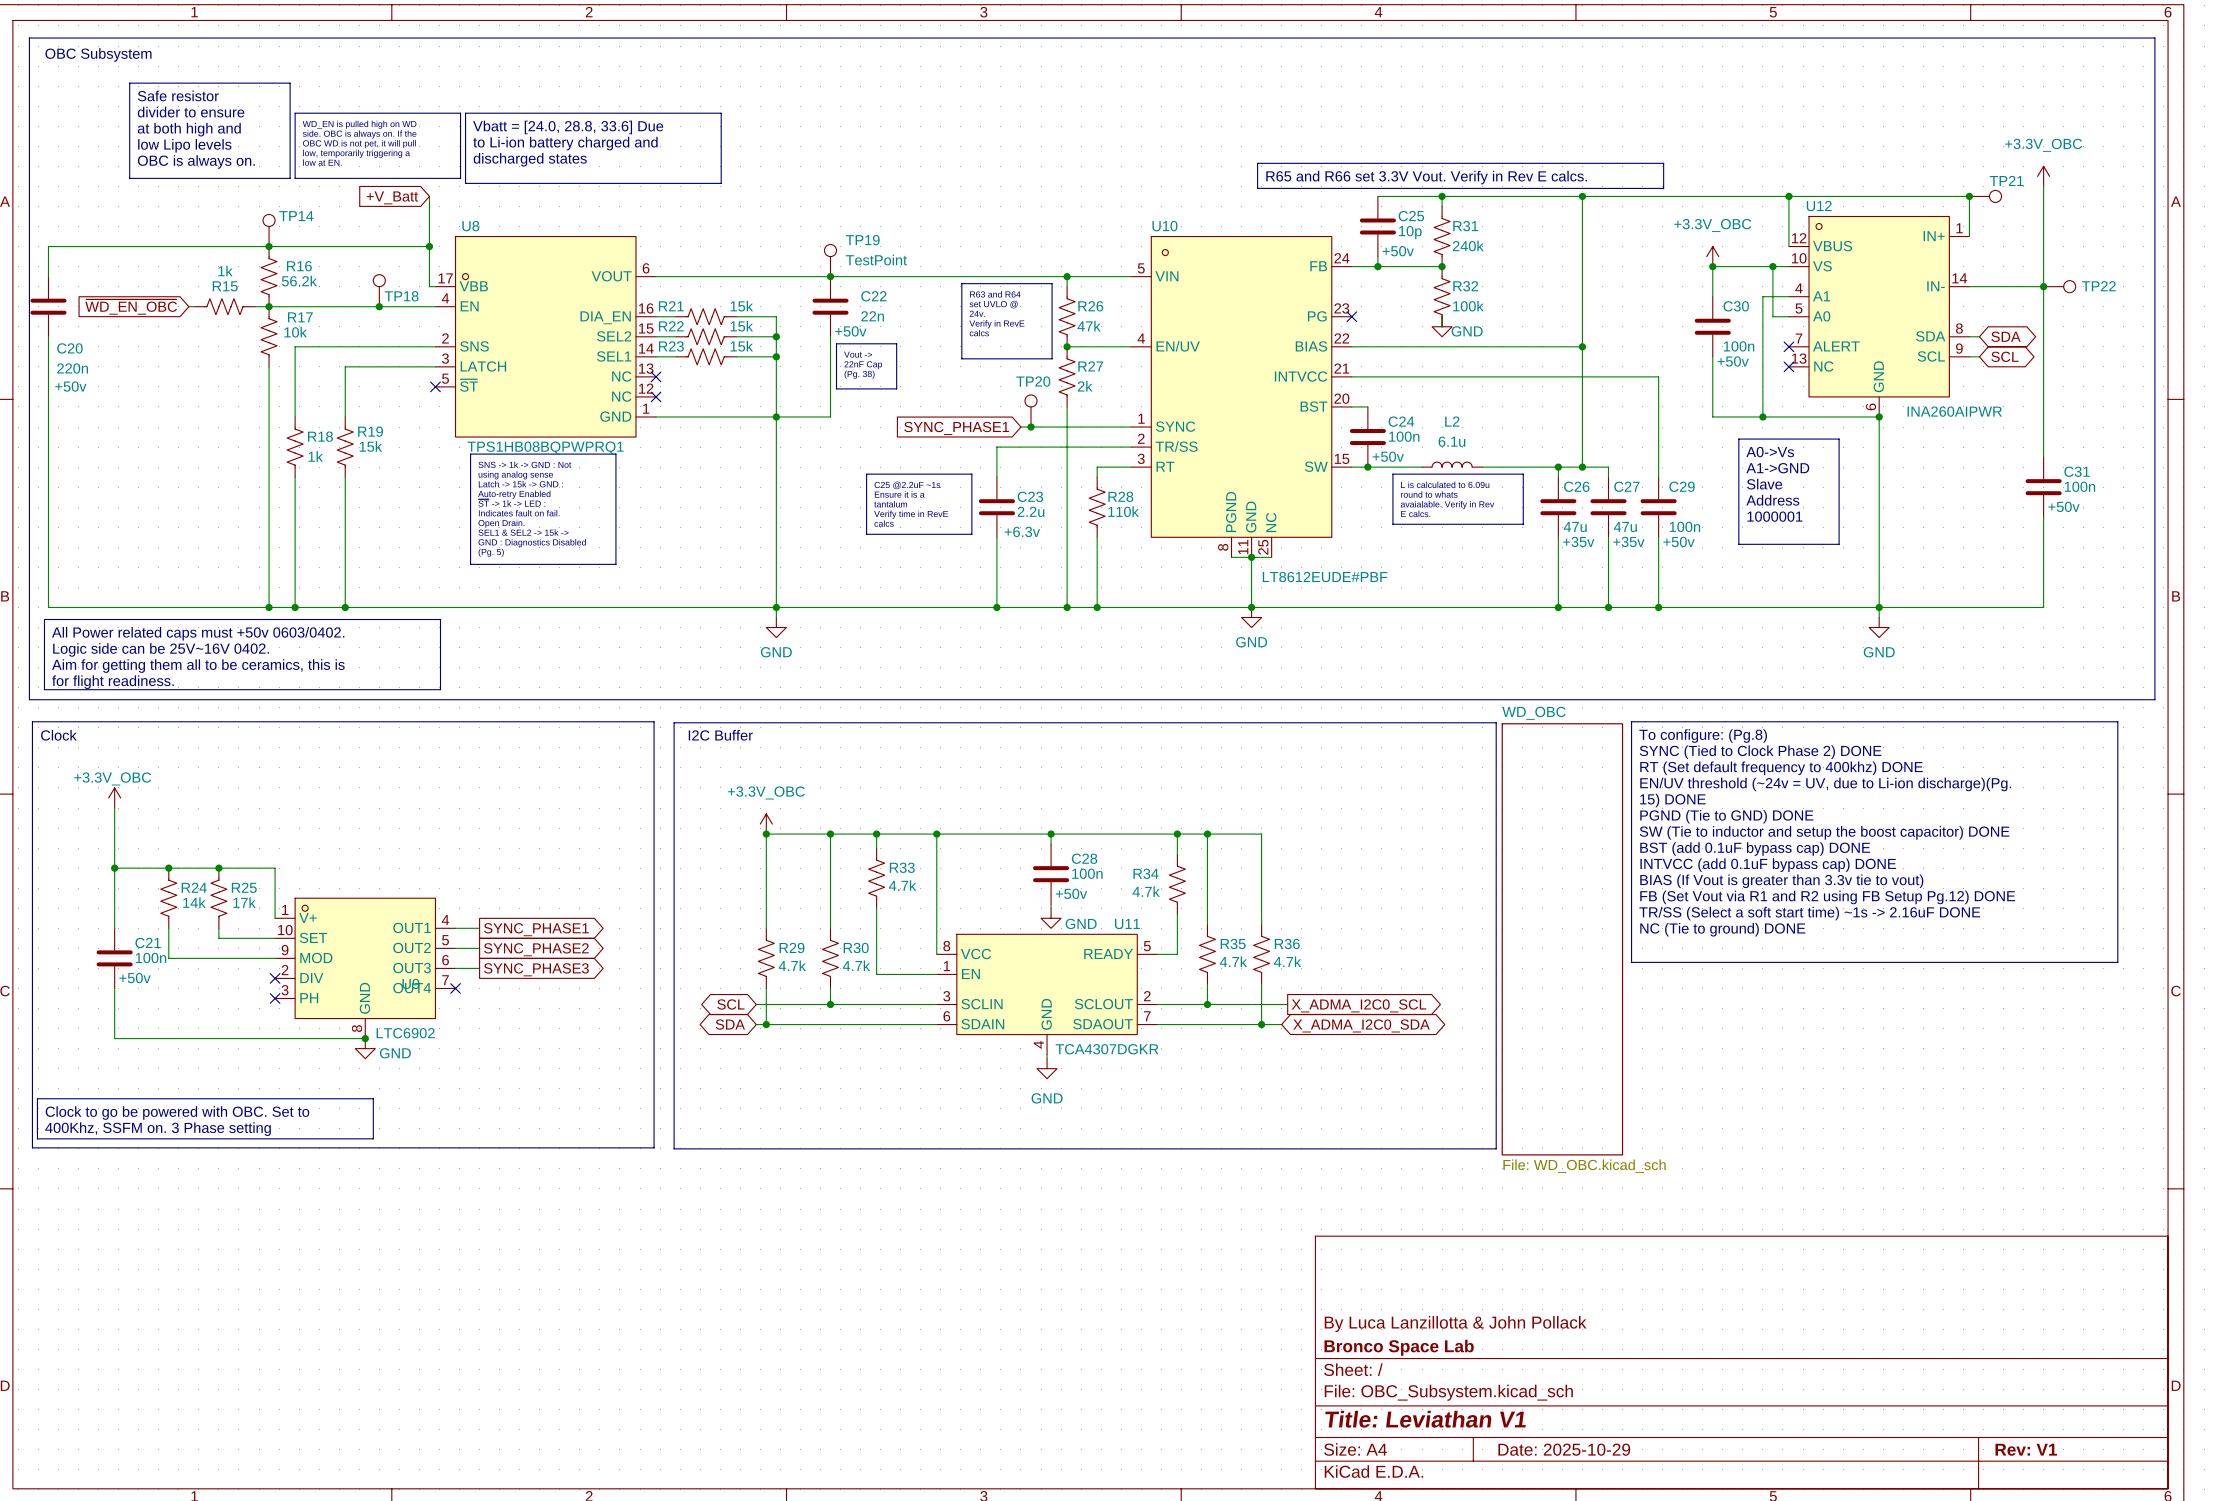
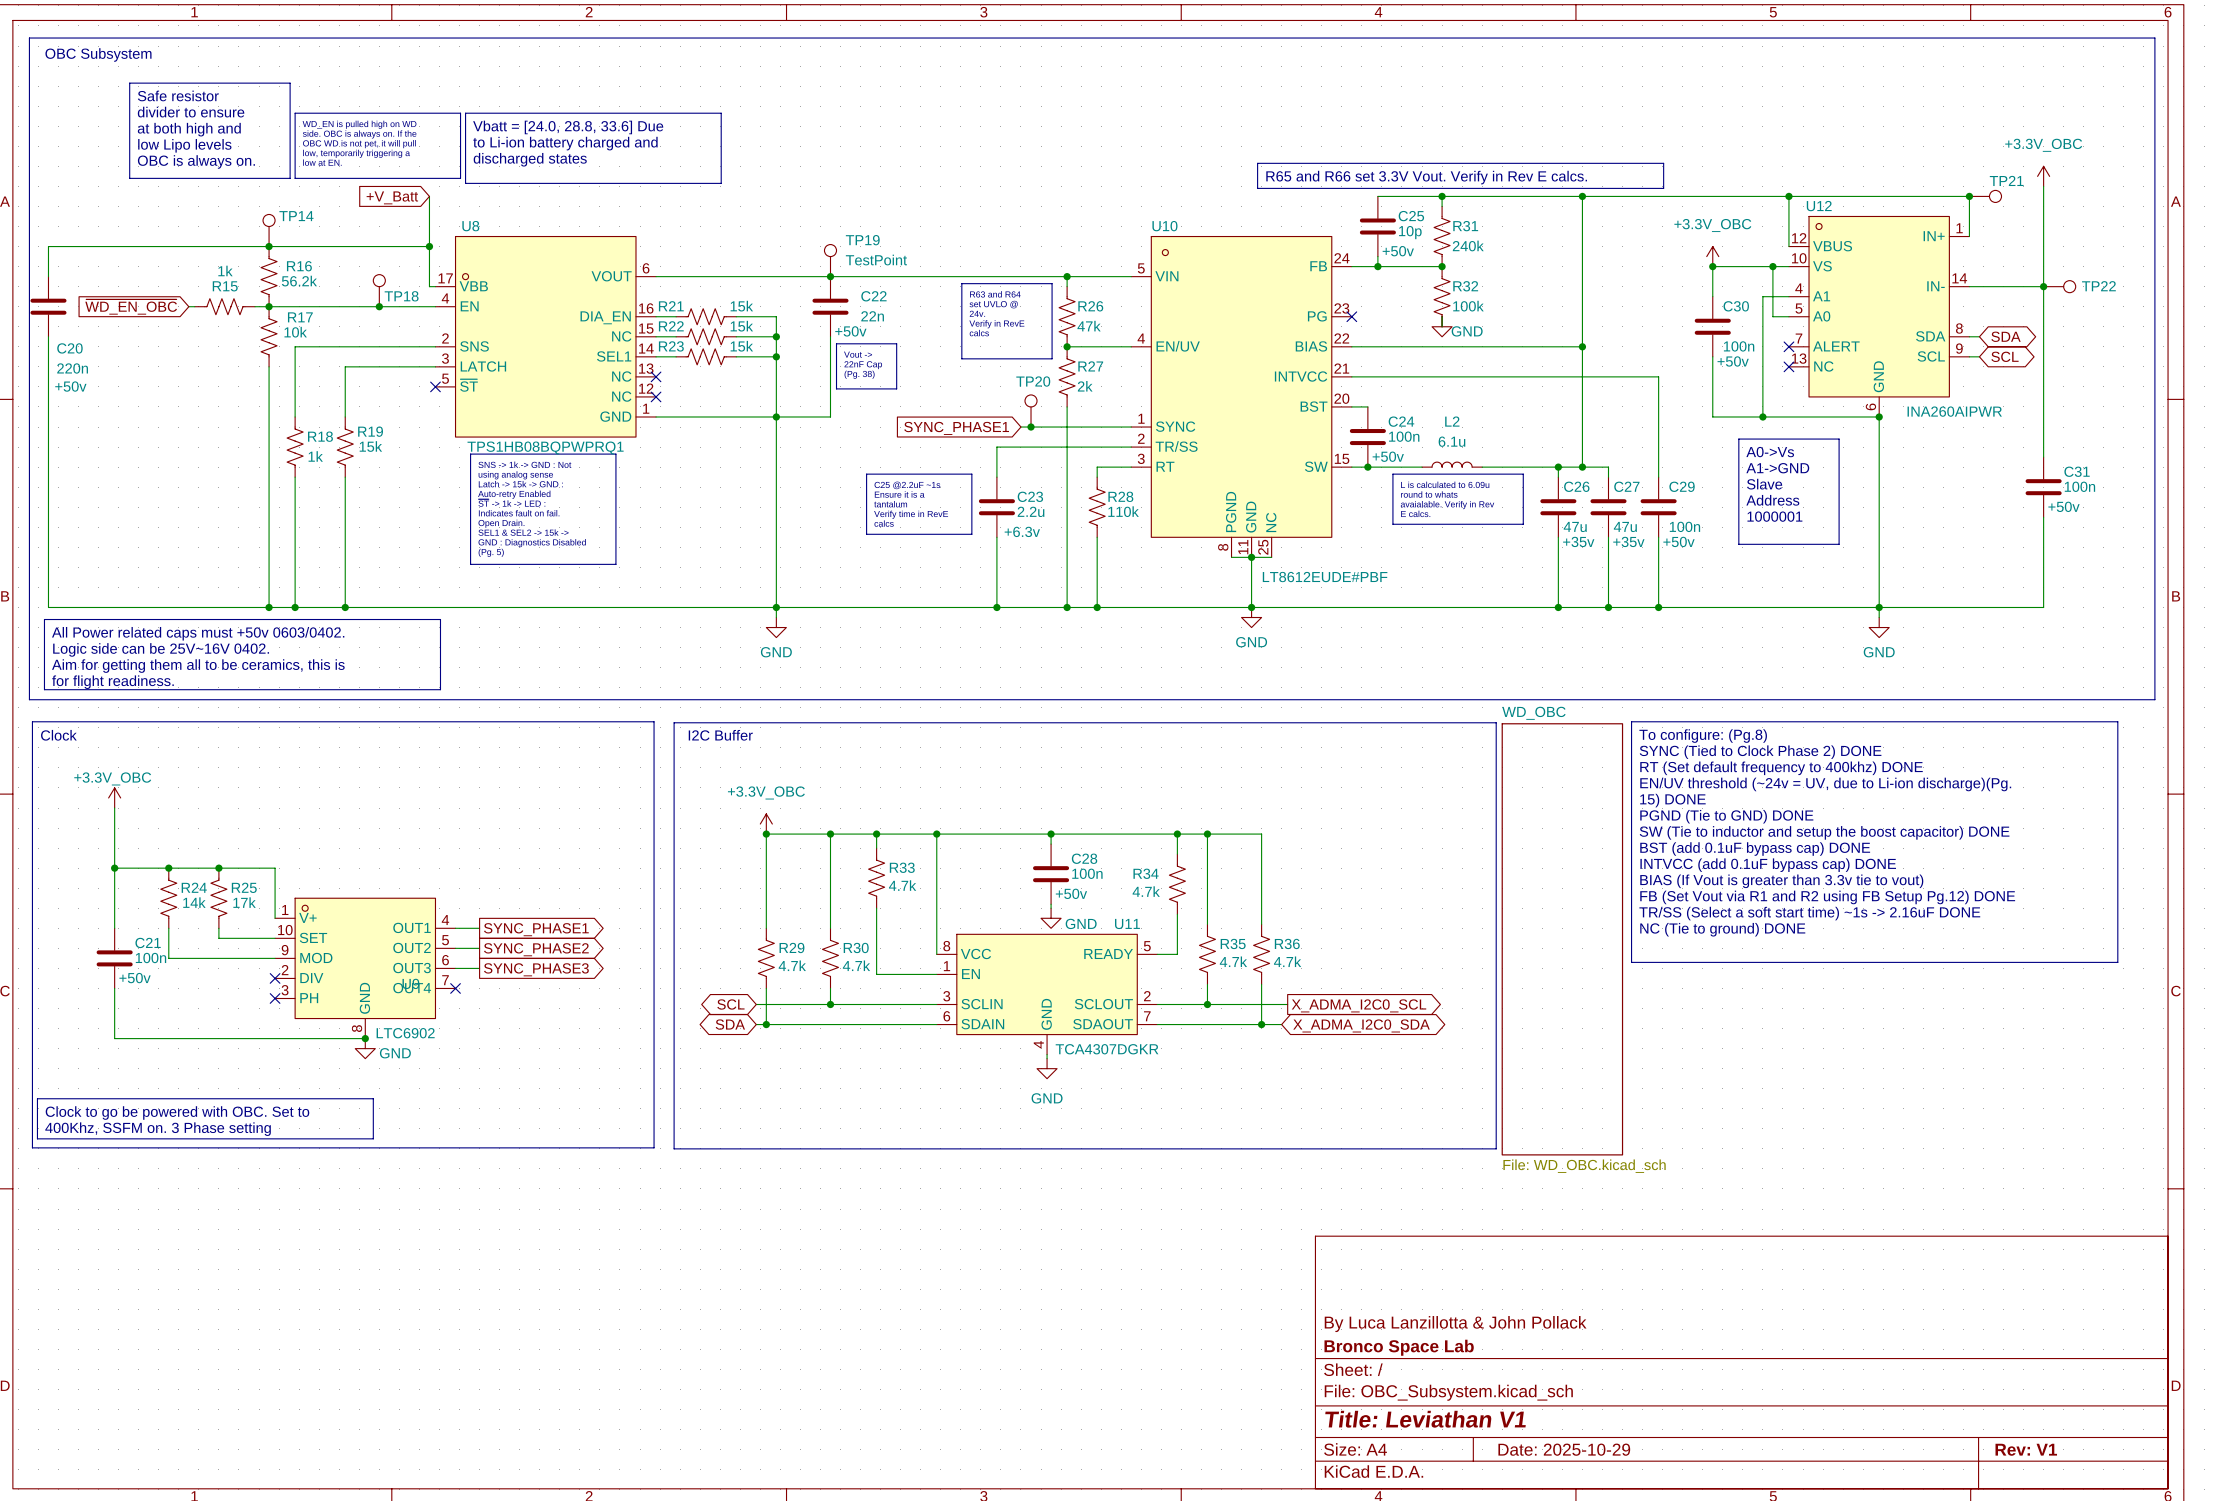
U8 pin name: SEL2 (614, 336) -> NC (621, 336)

